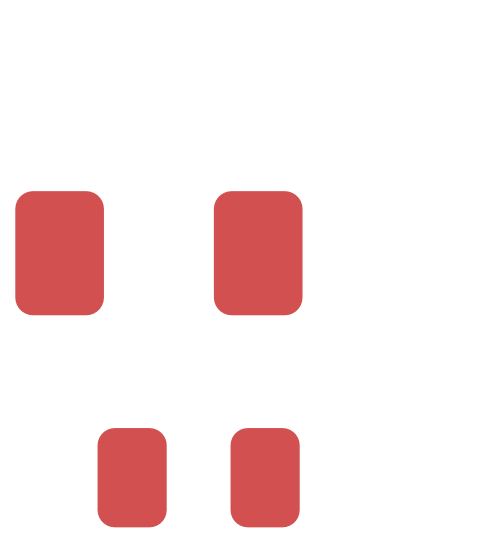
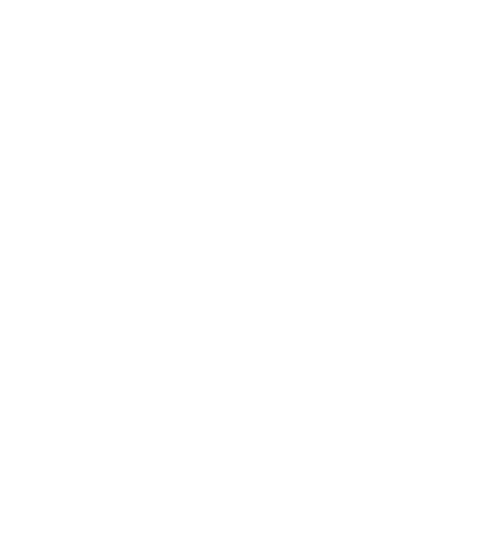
part: (158, 253) -> none
part: (198, 477) -> none

